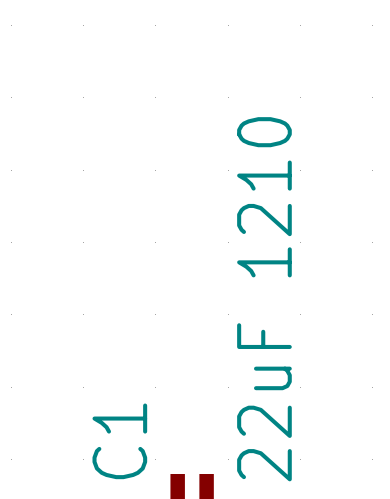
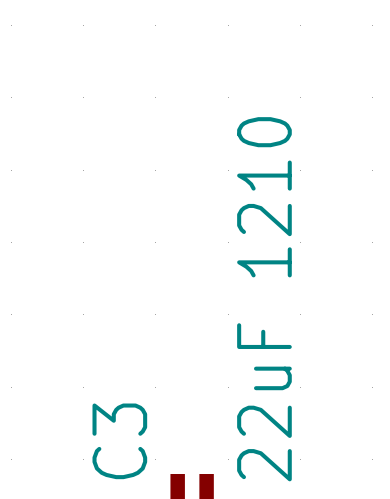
C1 name: C1 (119, 441) -> C3 (119, 441)

